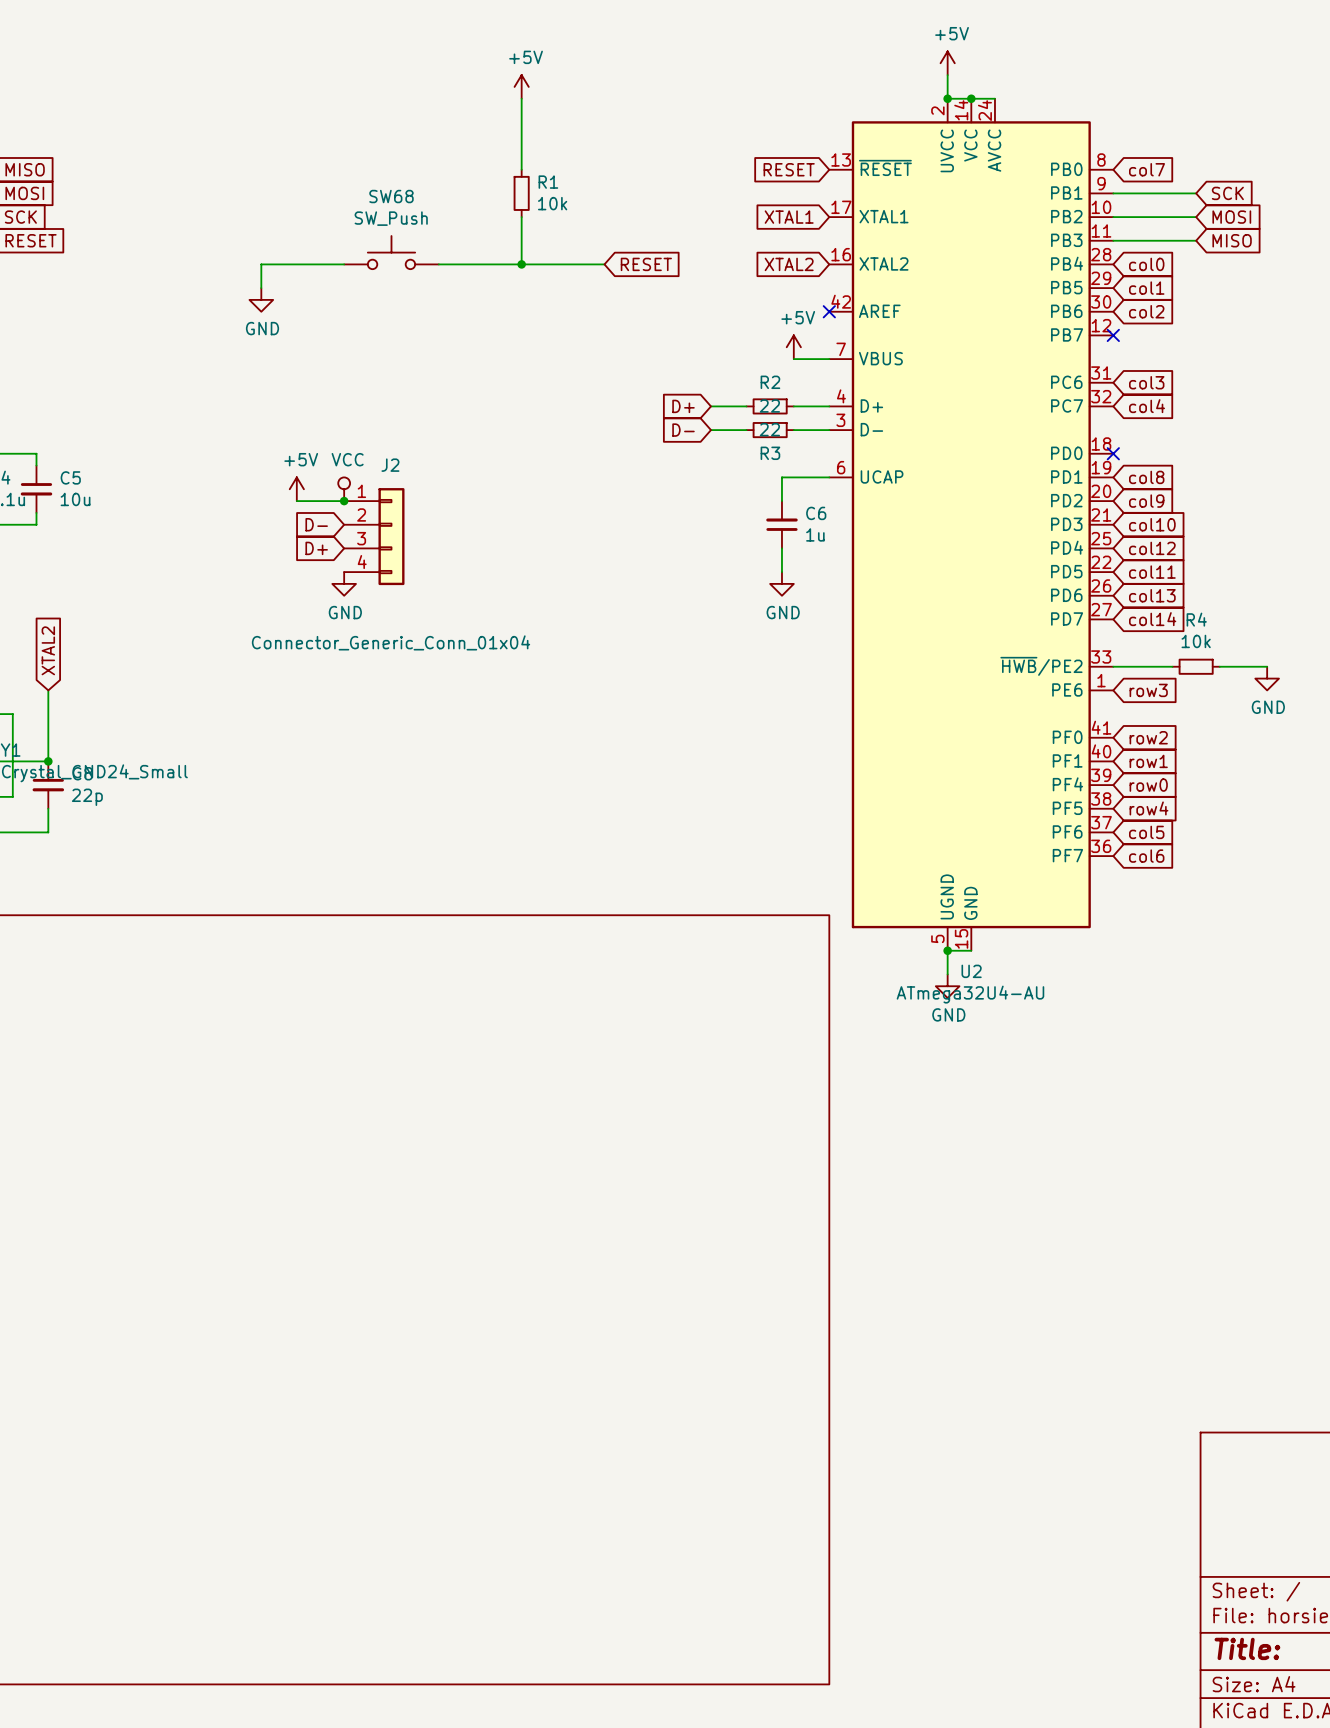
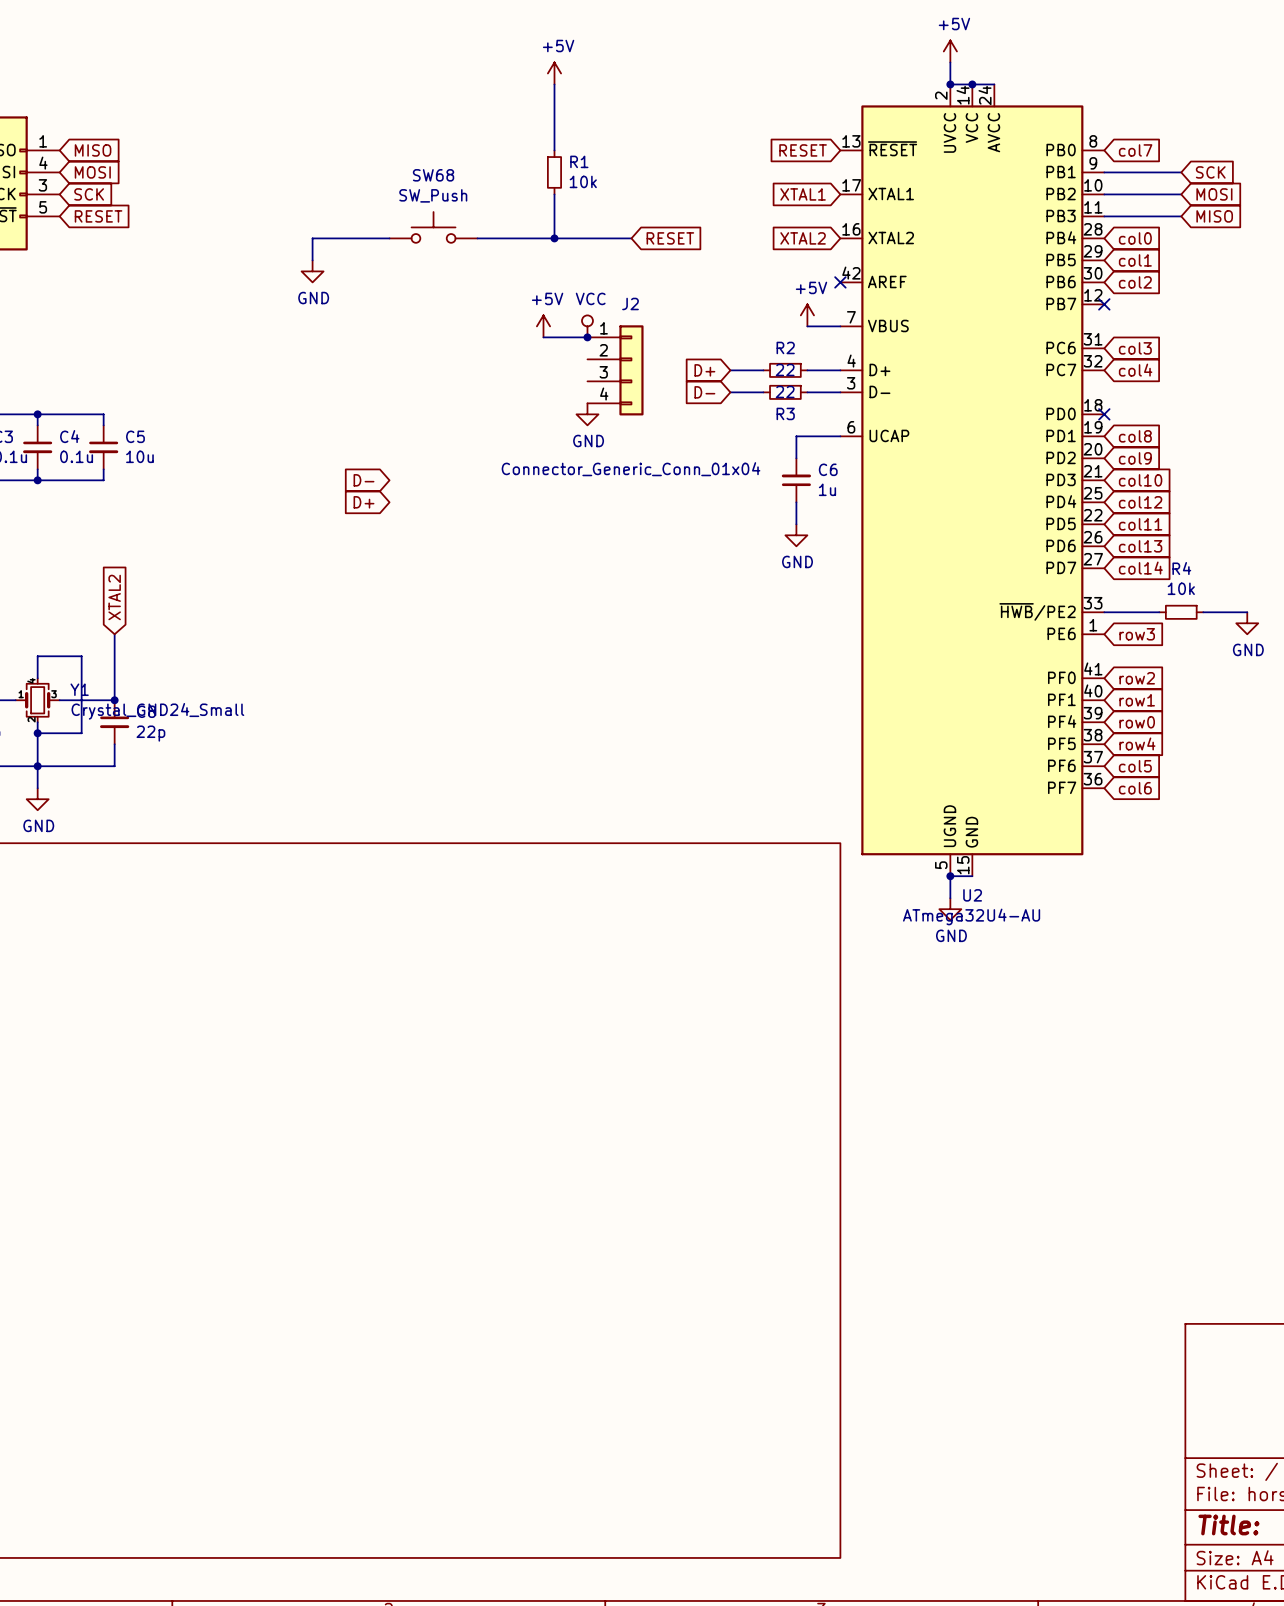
power symbol: none -> +5V (543, 326)
power symbol: none -> VCC (587, 326)
wire: none -> (543, 337) (587, 337)
junction: none -> (587, 337)
power symbol: none -> GND (587, 414)
power symbol: +5V (296, 489) -> none
power symbol: VCC (344, 489) -> none
wire: (296, 501) (344, 501) -> none
junction: (344, 501) -> none
J2 position: (374, 536) -> (615, 370)
power symbol: GND (344, 583) -> none

